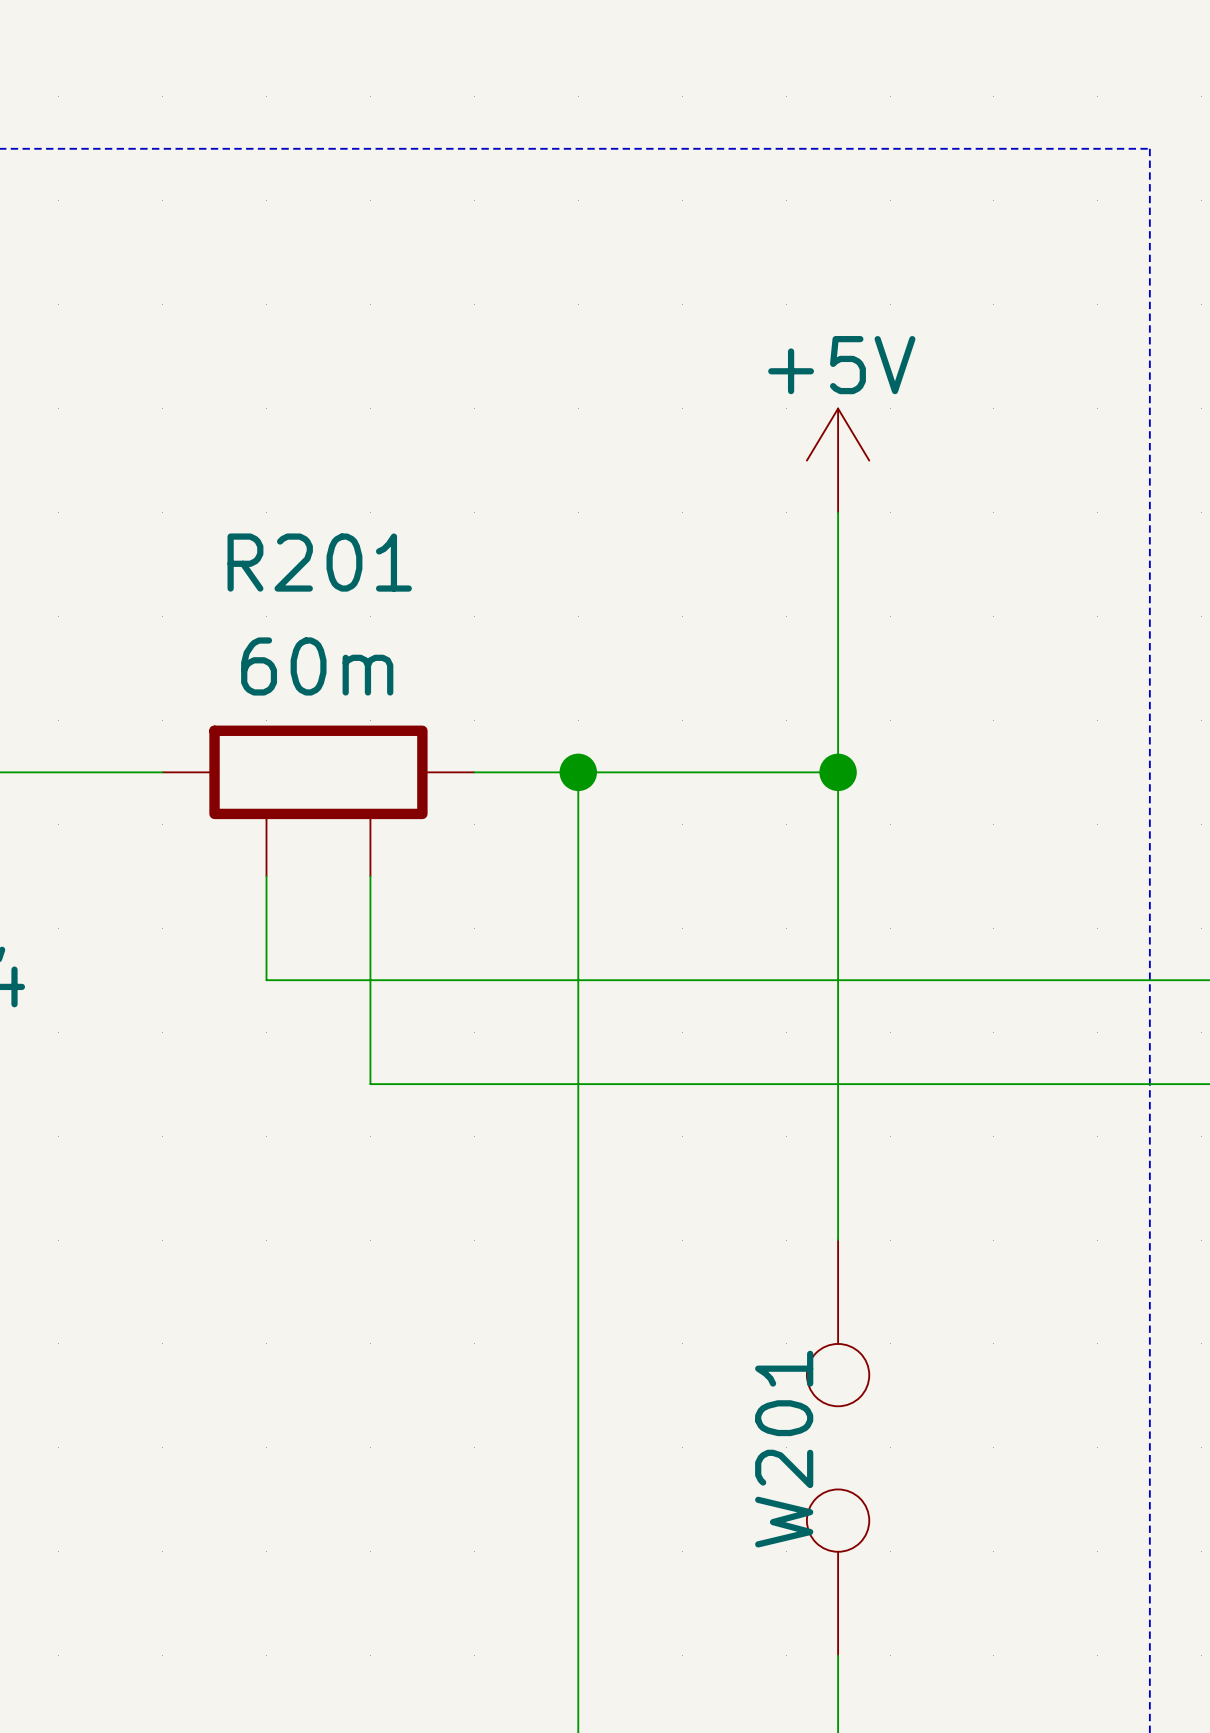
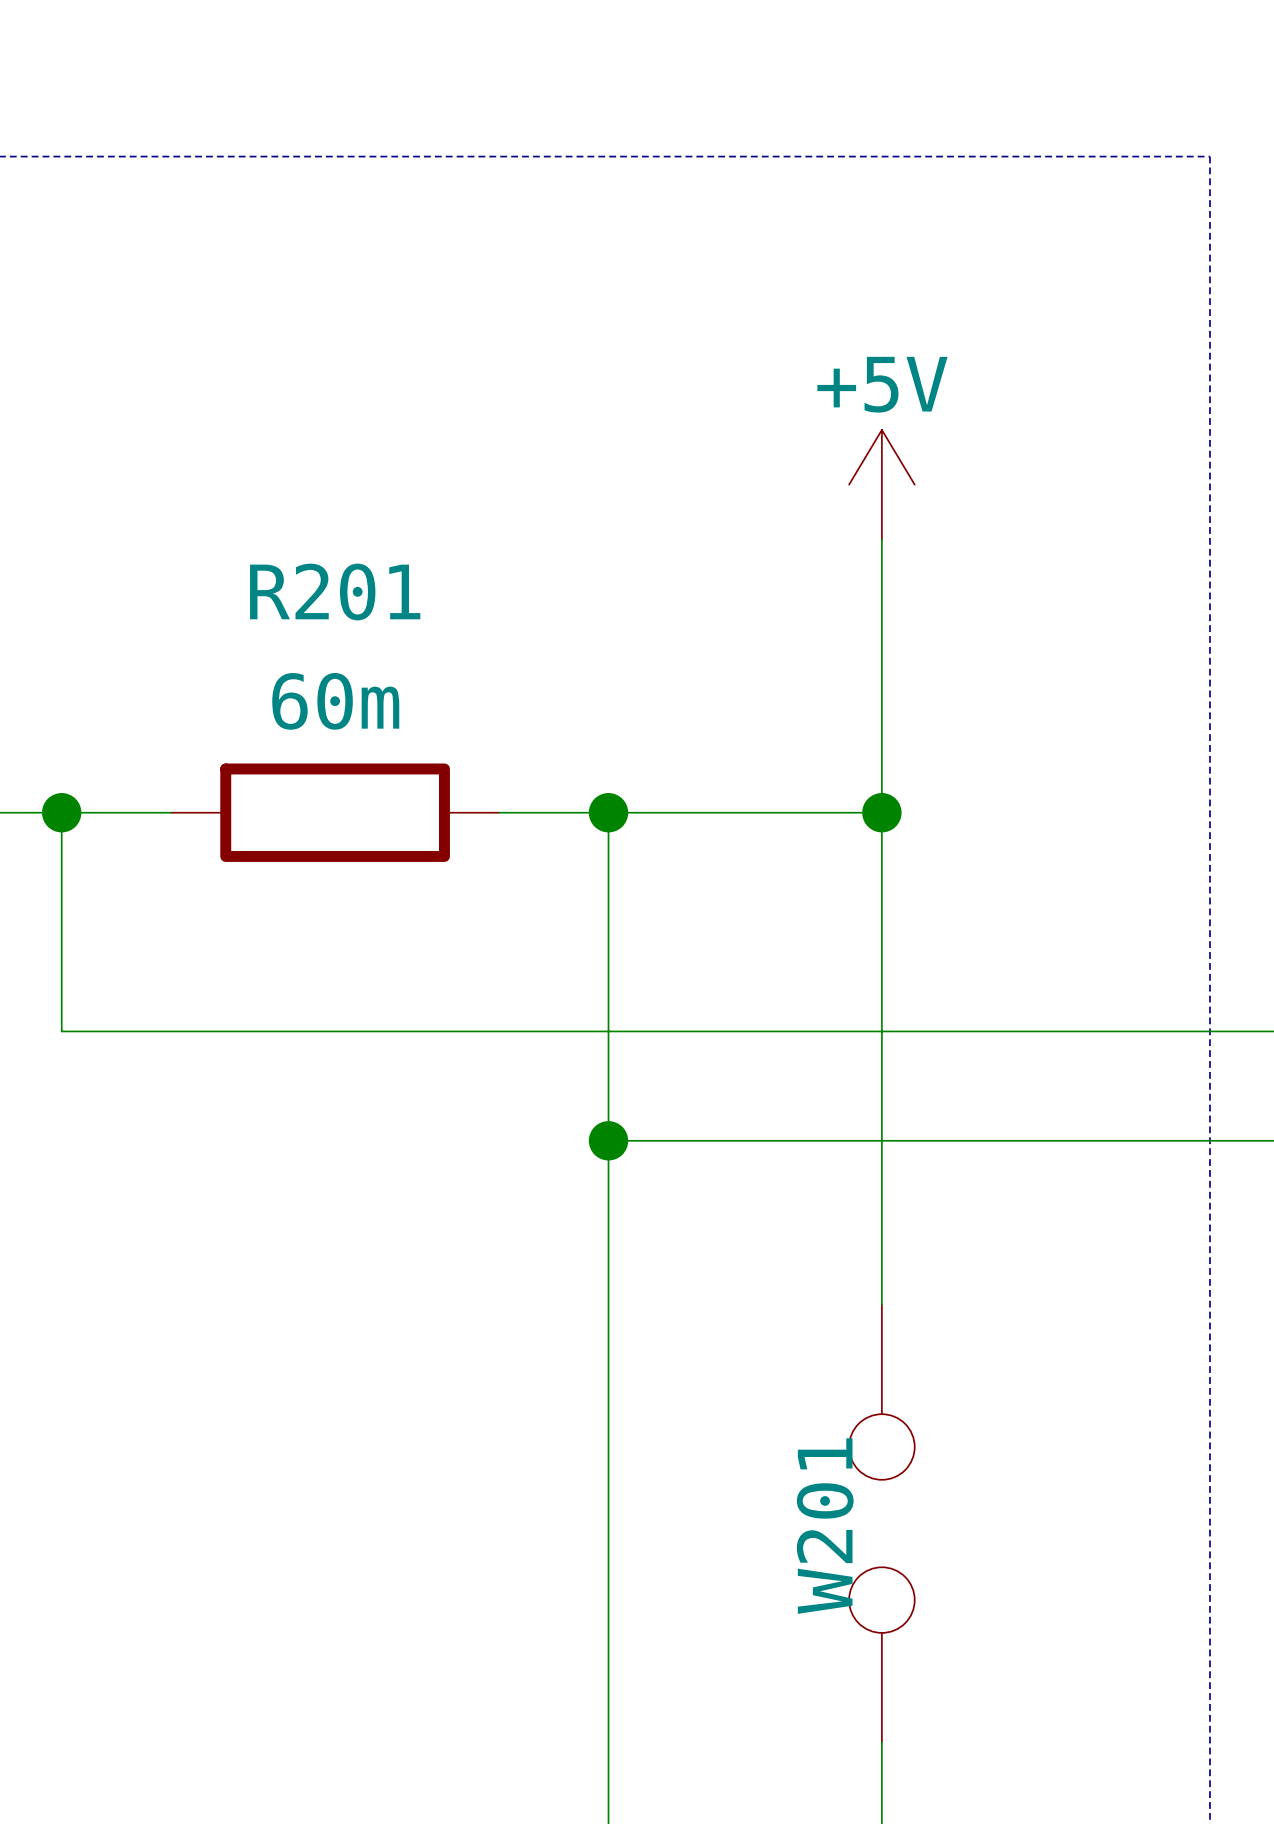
R201 symbol: [162, 725, 475, 877] -> [171, 763, 500, 862]
junction: none -> (61, 812)
wire: (266, 876) (266, 980) -> (61, 812) (61, 1031) (280, 1031)
wire: (370, 876) (370, 1084) (578, 1084) -> none
junction: none -> (608, 1140)

